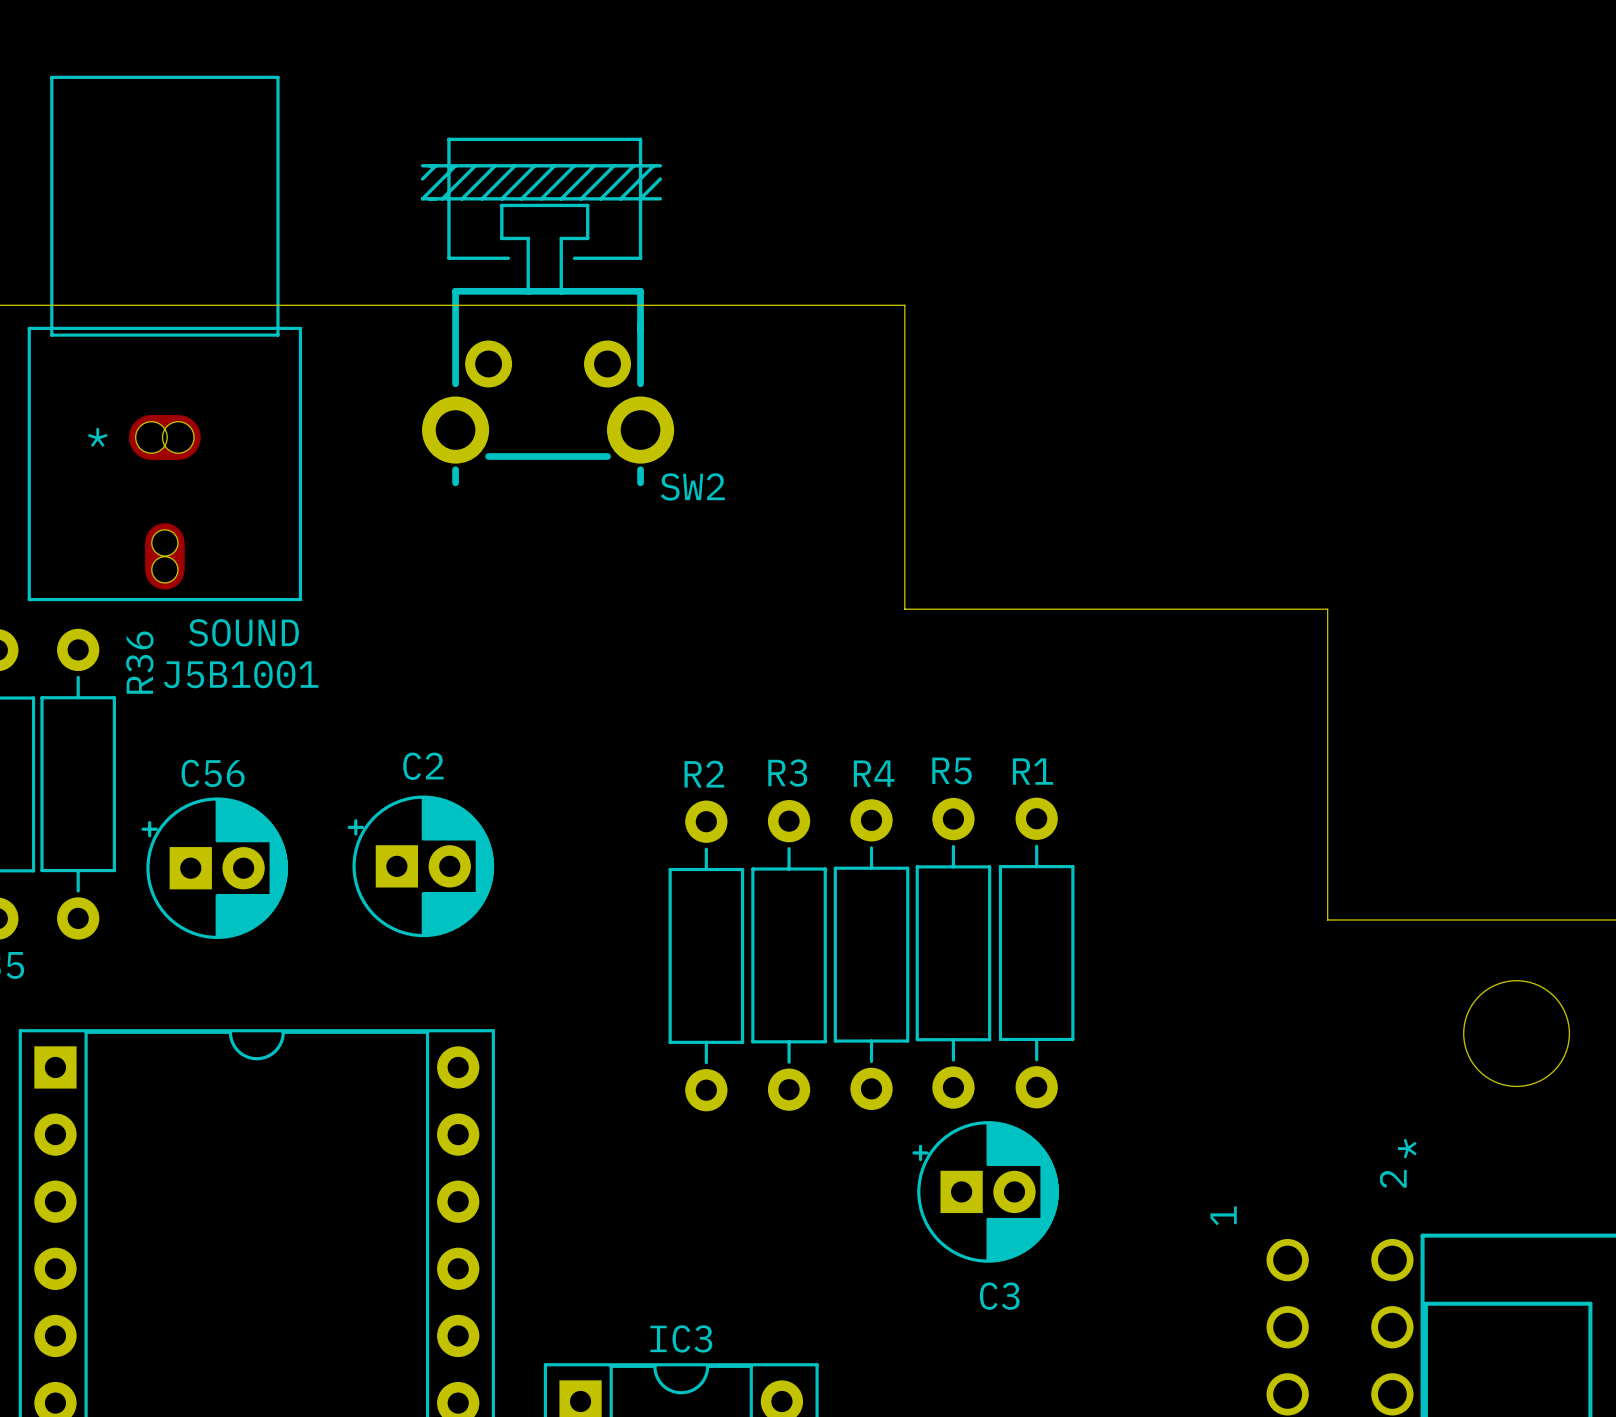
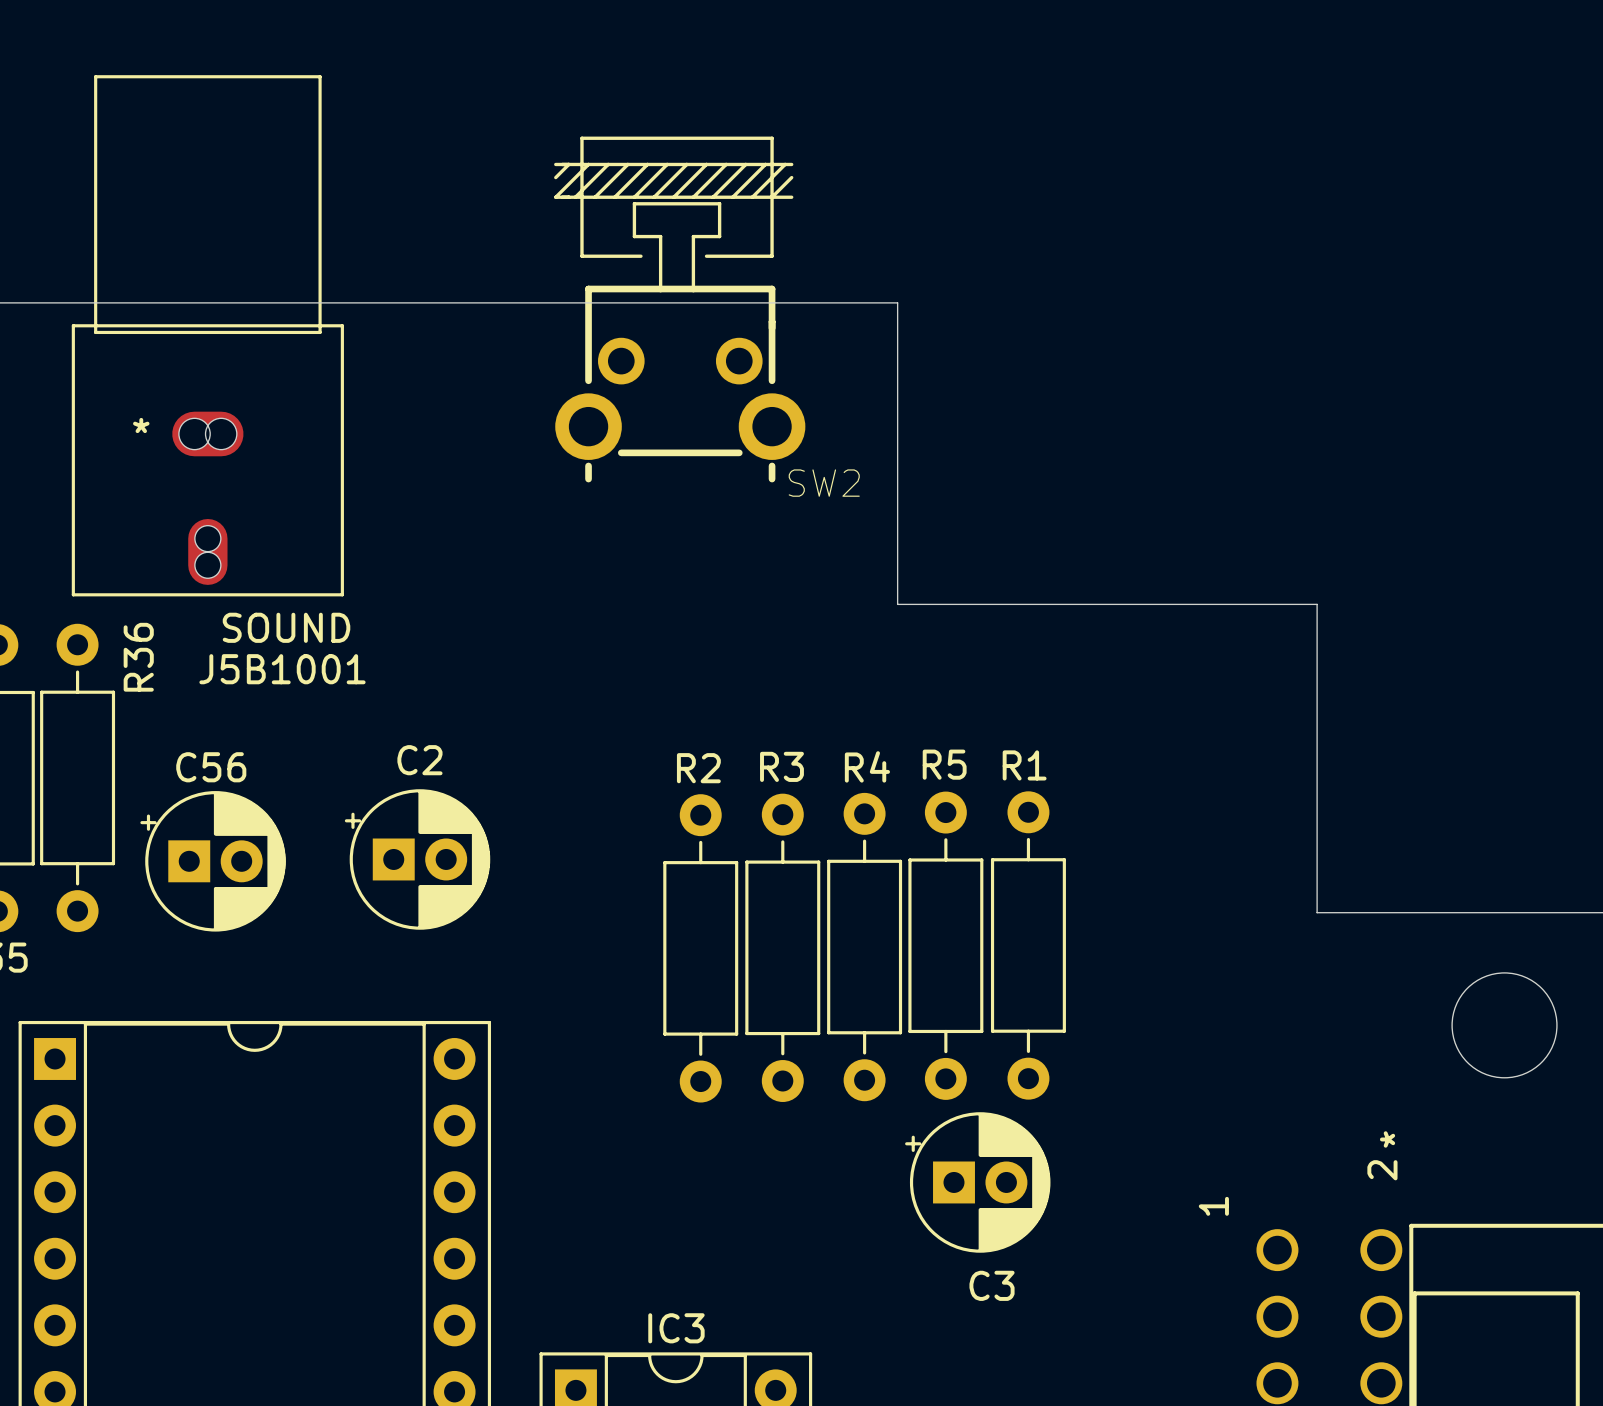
SW2 position: (547, 311) -> (679, 309)
J5B1001 position: (164, 338) -> (207, 335)

